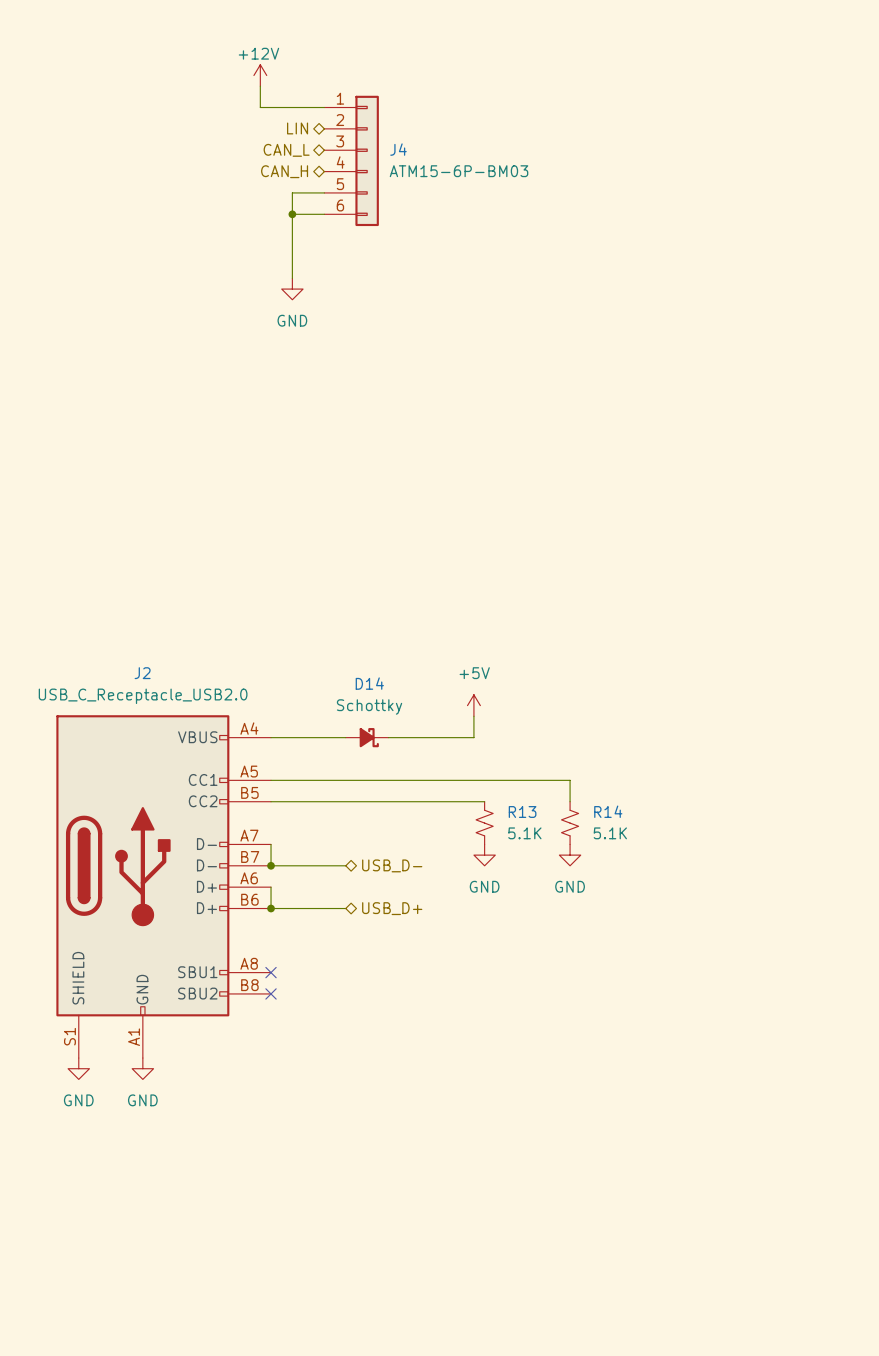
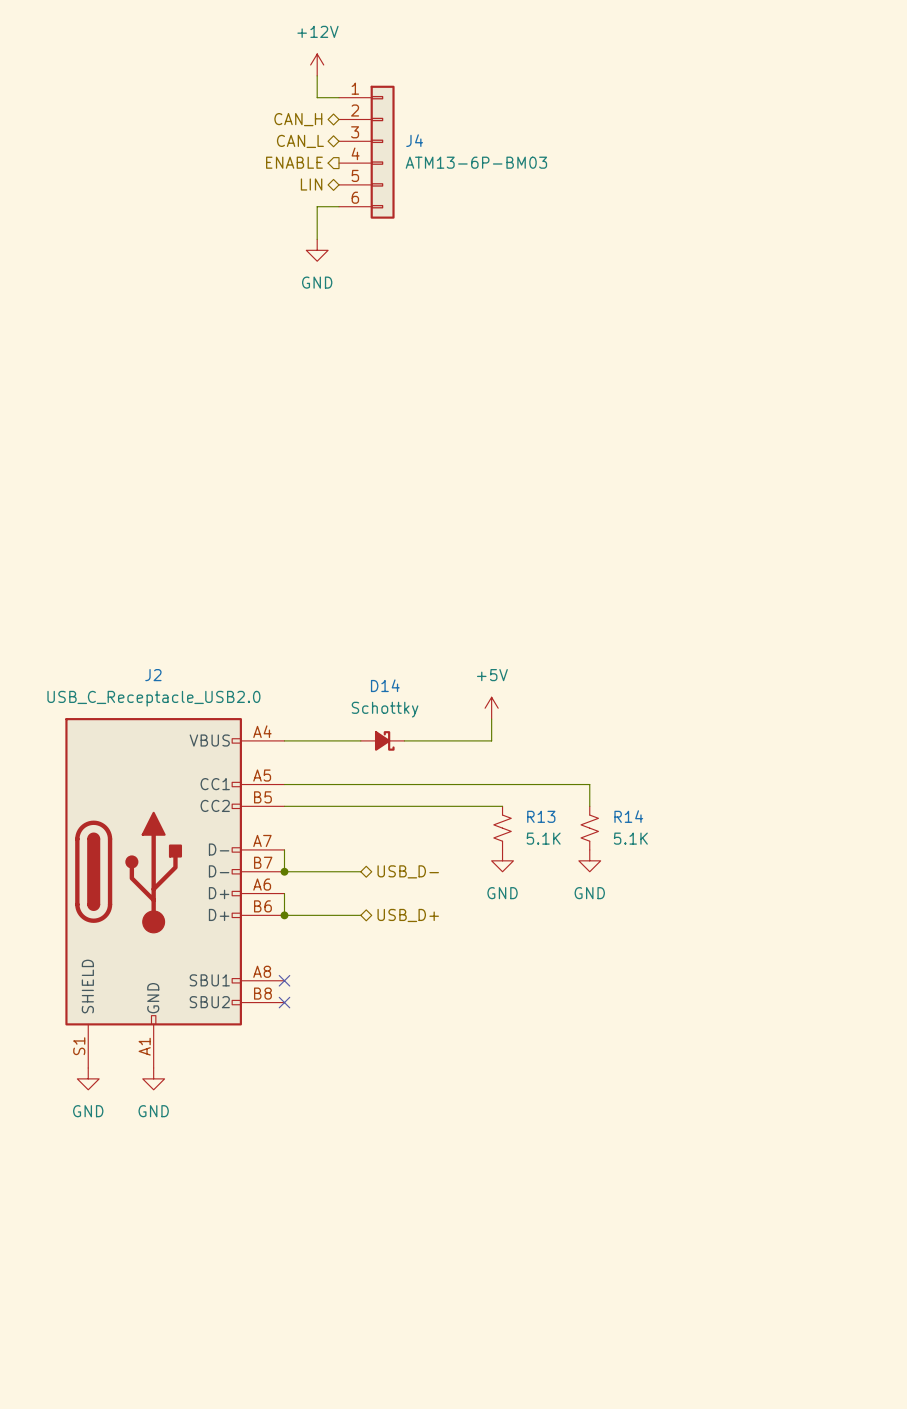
power symbol text position: +12V (258, 53) -> +12V (317, 31)
power symbol position: +12V (260, 75) -> +12V (317, 64)
wire: (260, 86) (260, 107) (303, 107) -> (317, 75) (317, 97)
hierarchical label: LIN (297, 128) -> CAN_H (298, 119)
hierarchical label shape: bidirectional (284, 171) -> output (294, 162)
hierarchical label: CAN_H (284, 171) -> ENABLE (294, 162)
J4 value: ATM15-6P-BM03 (459, 171) -> ATM13-6P-BM03 (476, 162)
hierarchical label: none -> LIN (311, 184)
wire: (324, 192) (292, 192) (292, 278) -> none
wire: (292, 214) (303, 214) -> (317, 239) (317, 206)
junction: (292, 214) -> none
power symbol position: GND (292, 289) -> GND (317, 250)

